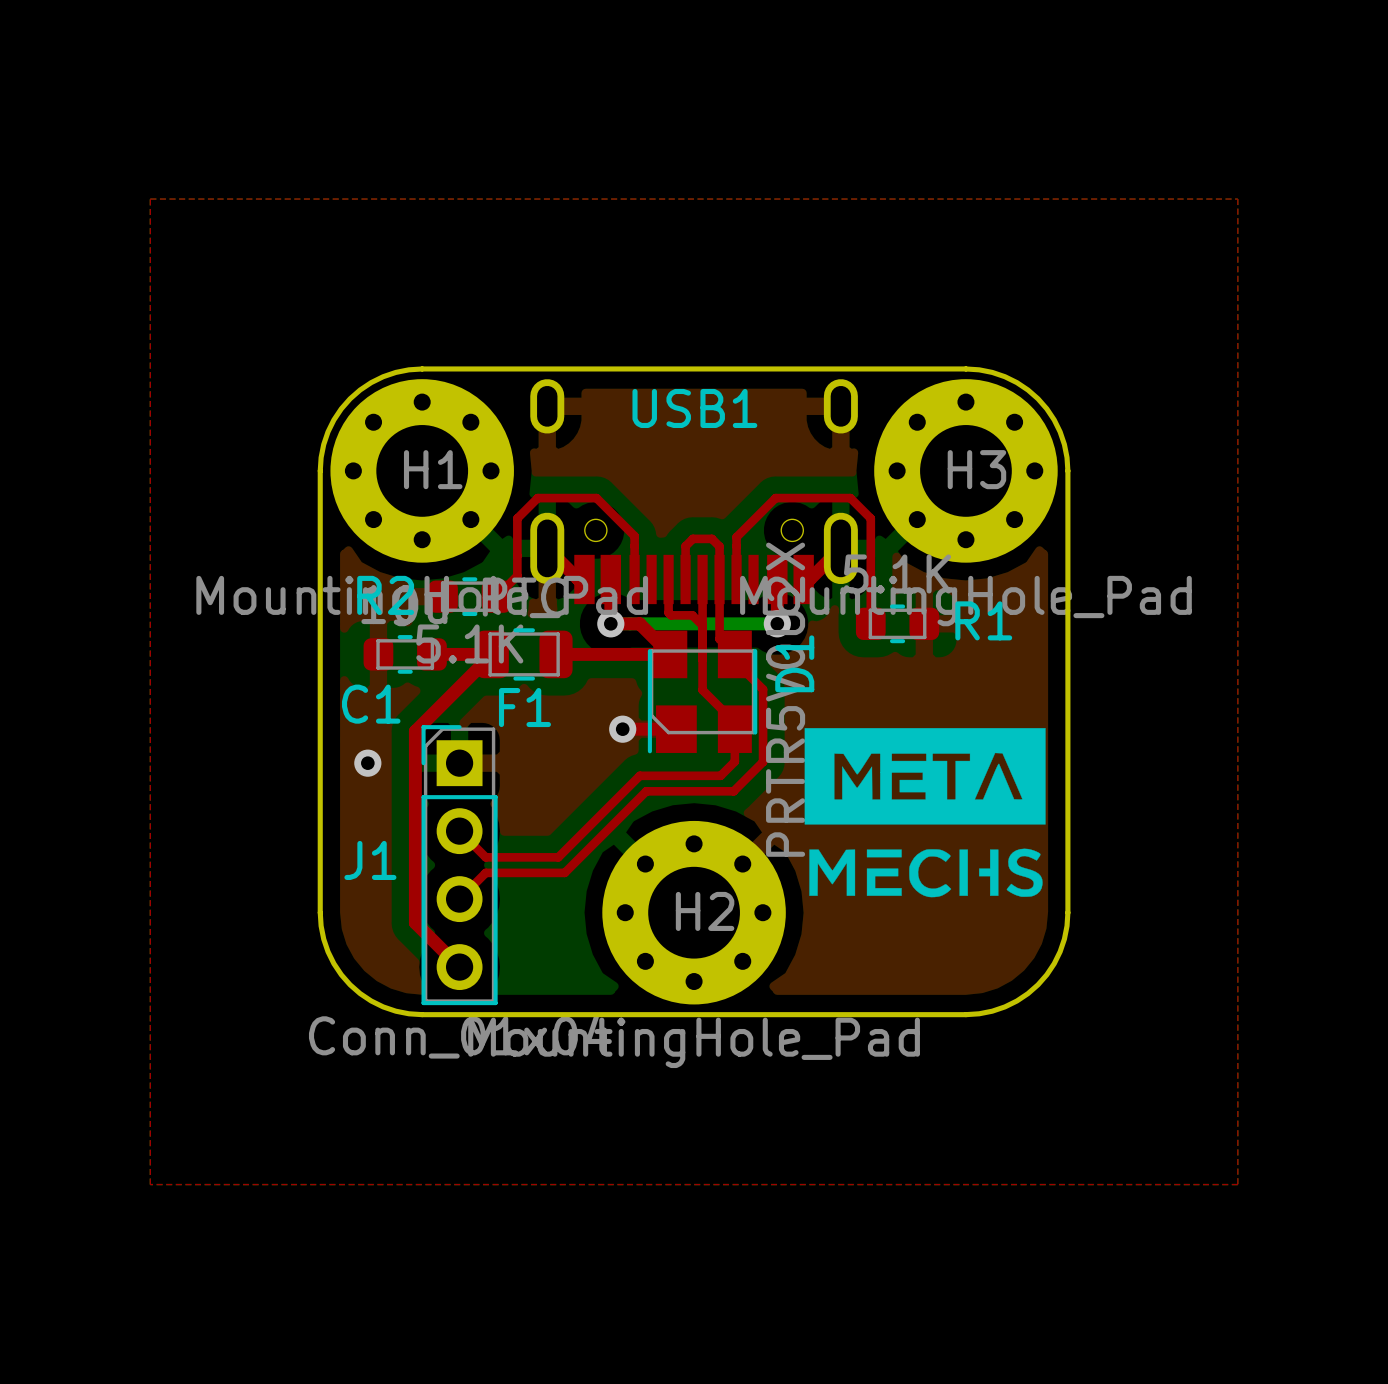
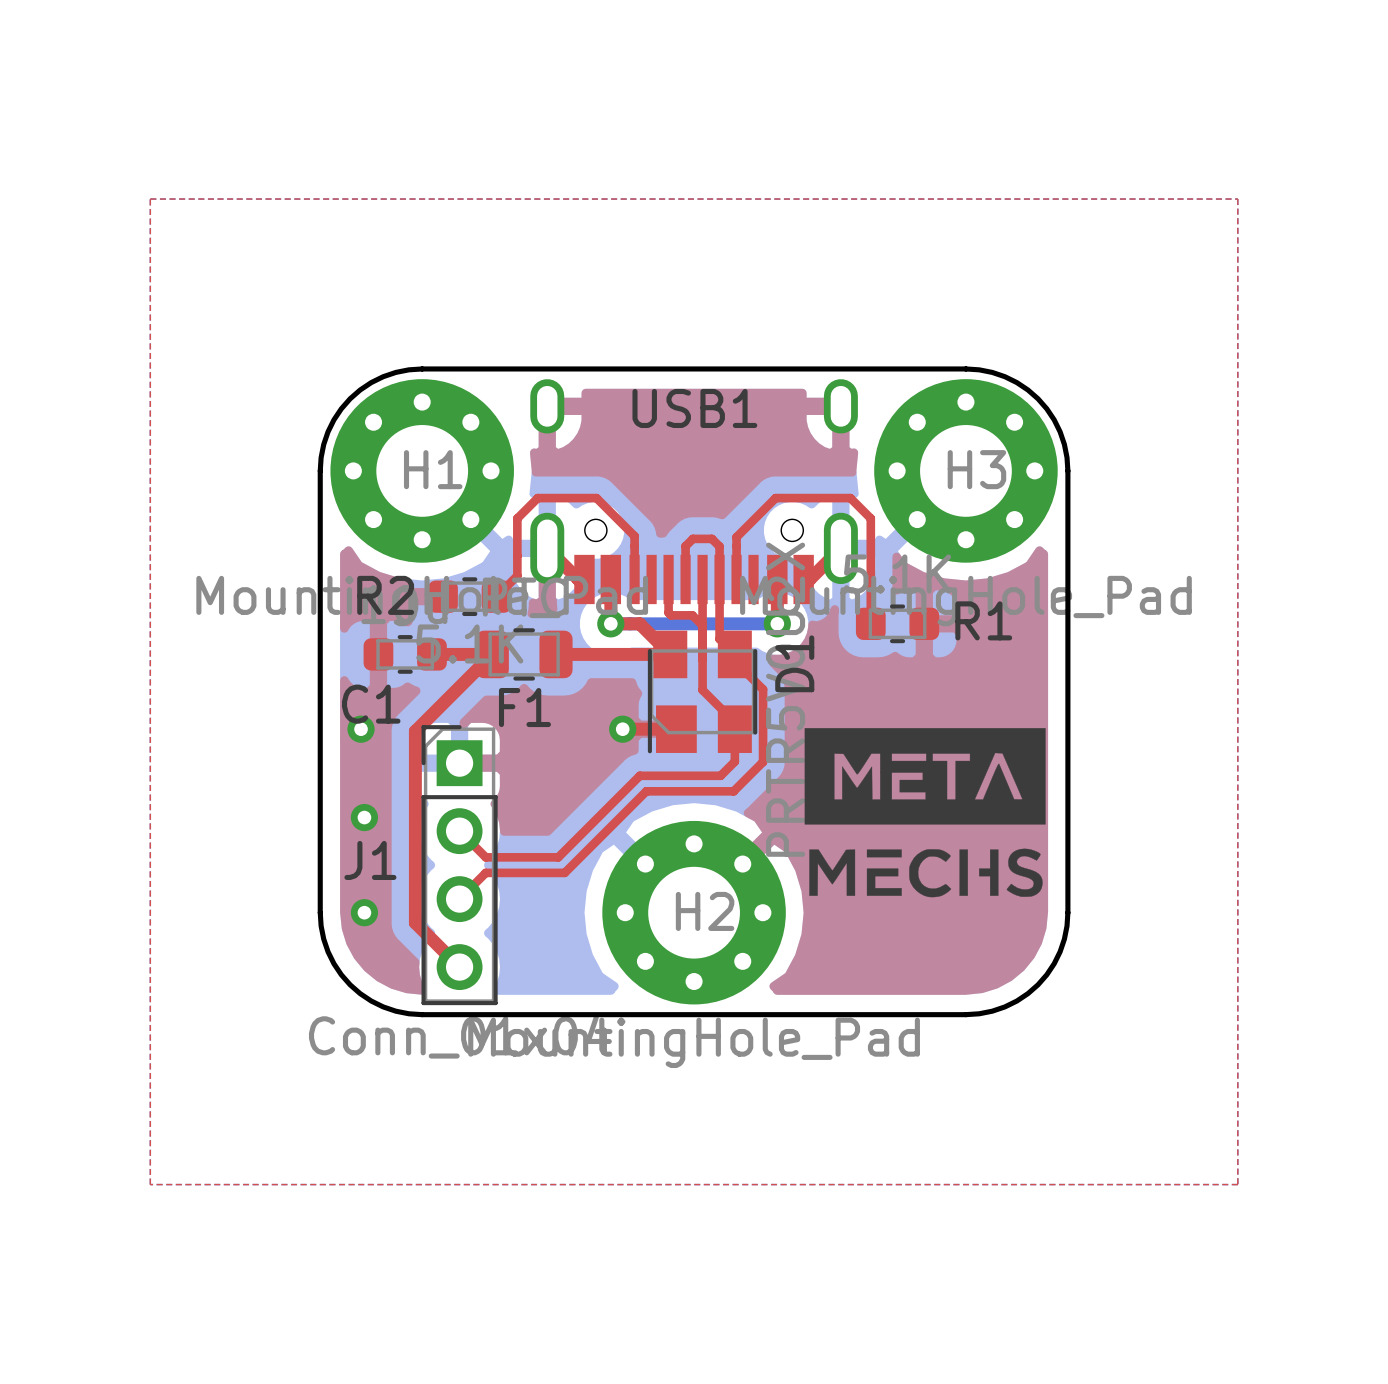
via: none -> (361, 729)
via: (367, 763) -> none
via: none -> (364, 817)
via: none -> (364, 912)

